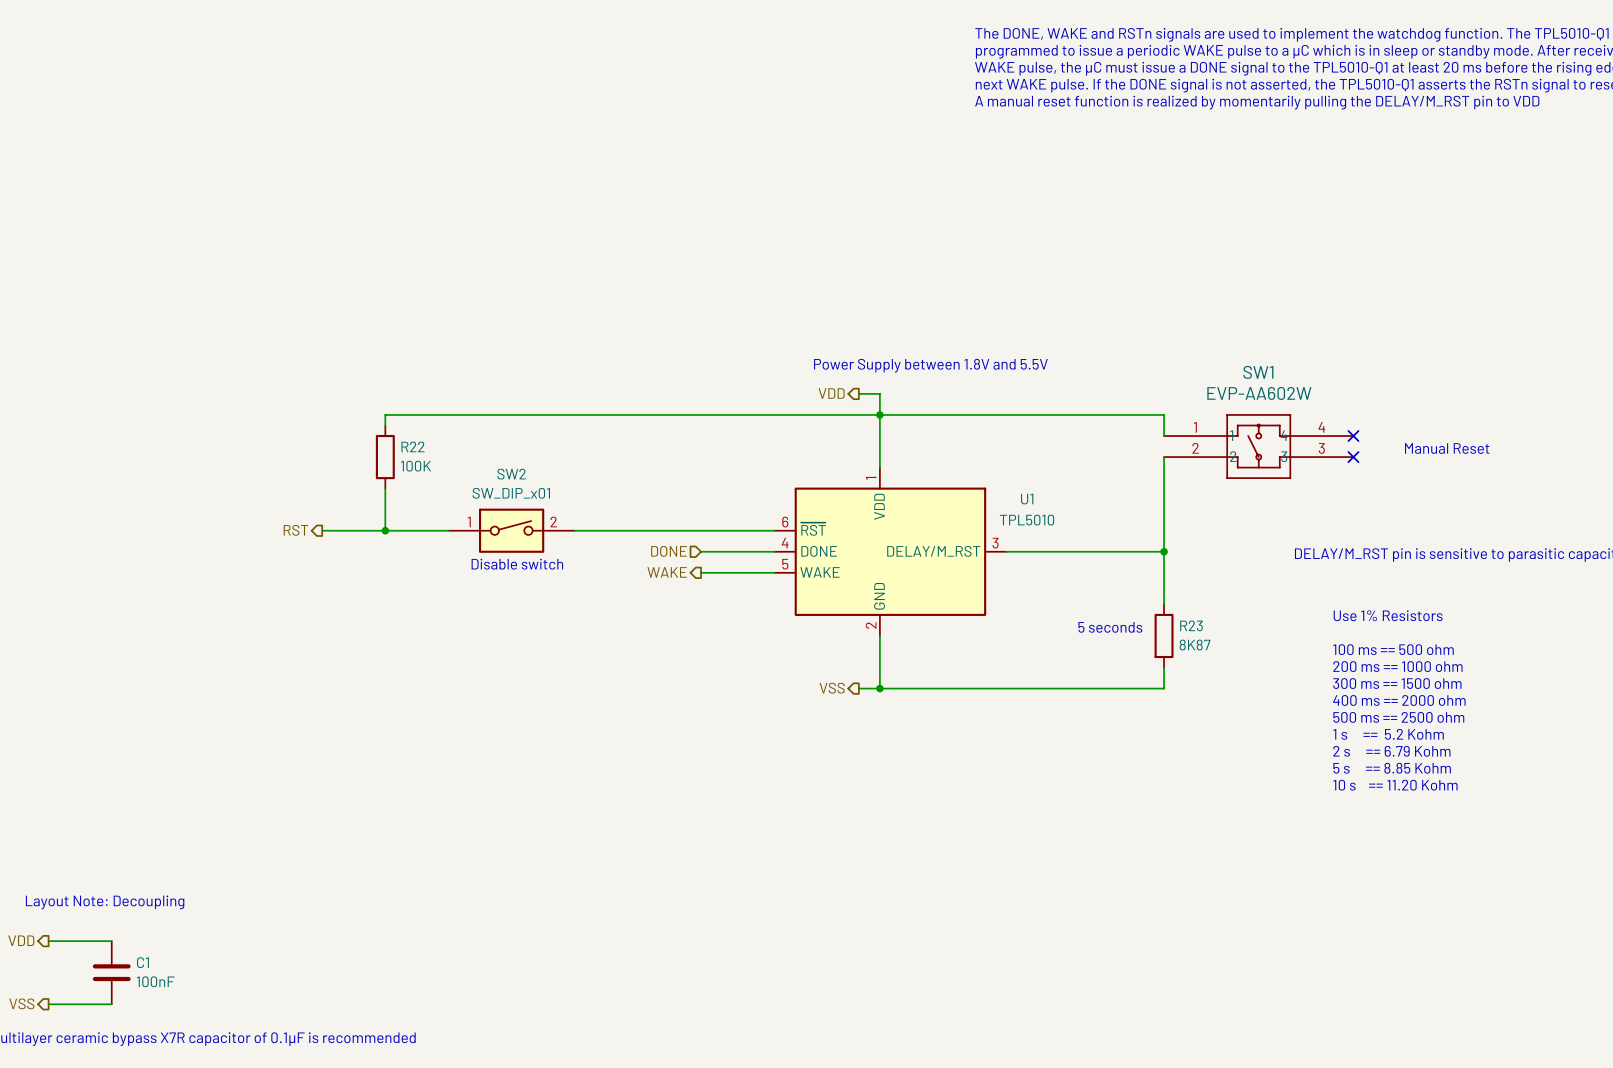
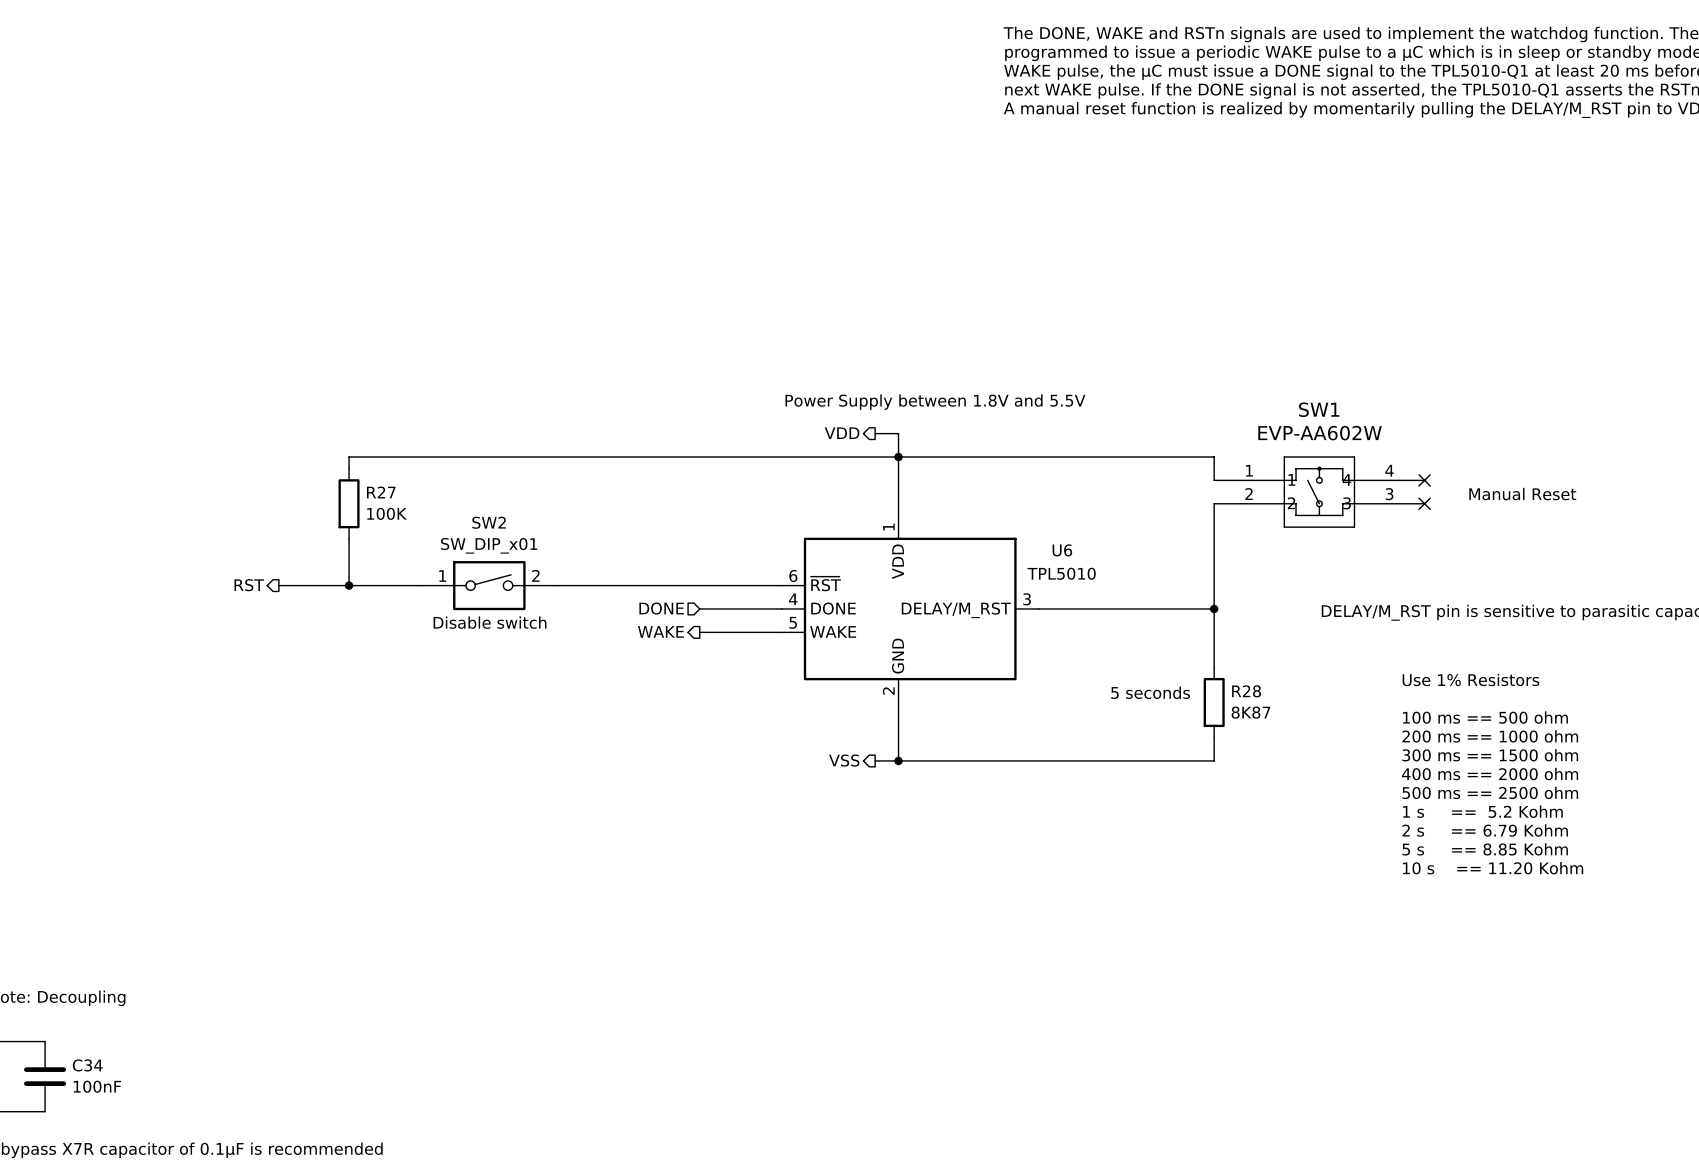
R22 name: R22 (412, 446) -> R27 (381, 492)
U1 name: U1 (1027, 499) -> U6 (1062, 550)
R23 name: R23 (1191, 625) -> R28 (1246, 691)
C1 name: C1 (142, 962) -> C34 (87, 1065)

